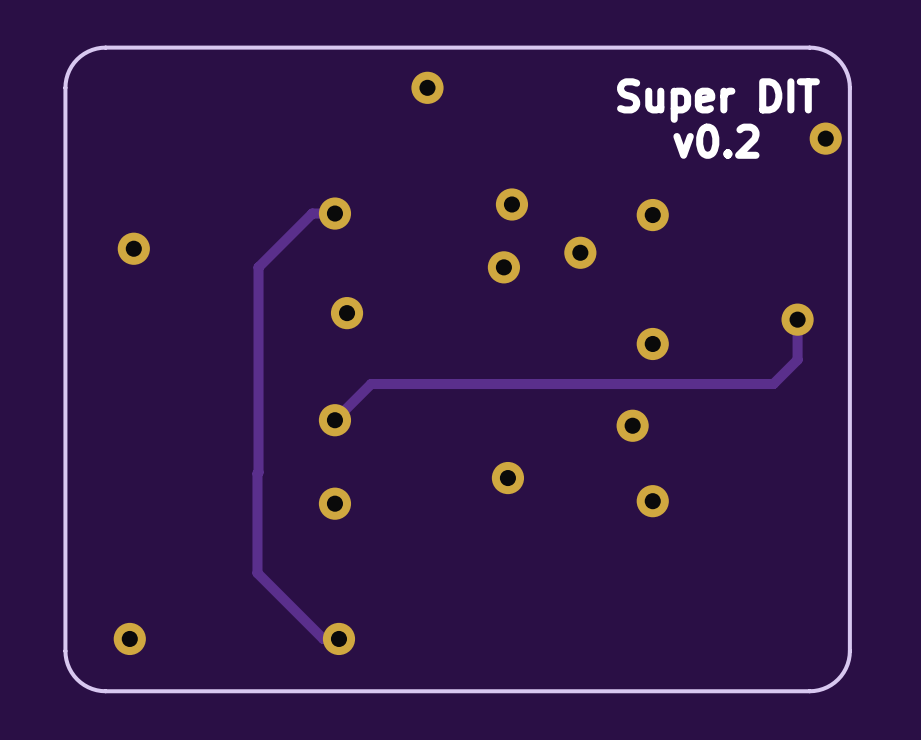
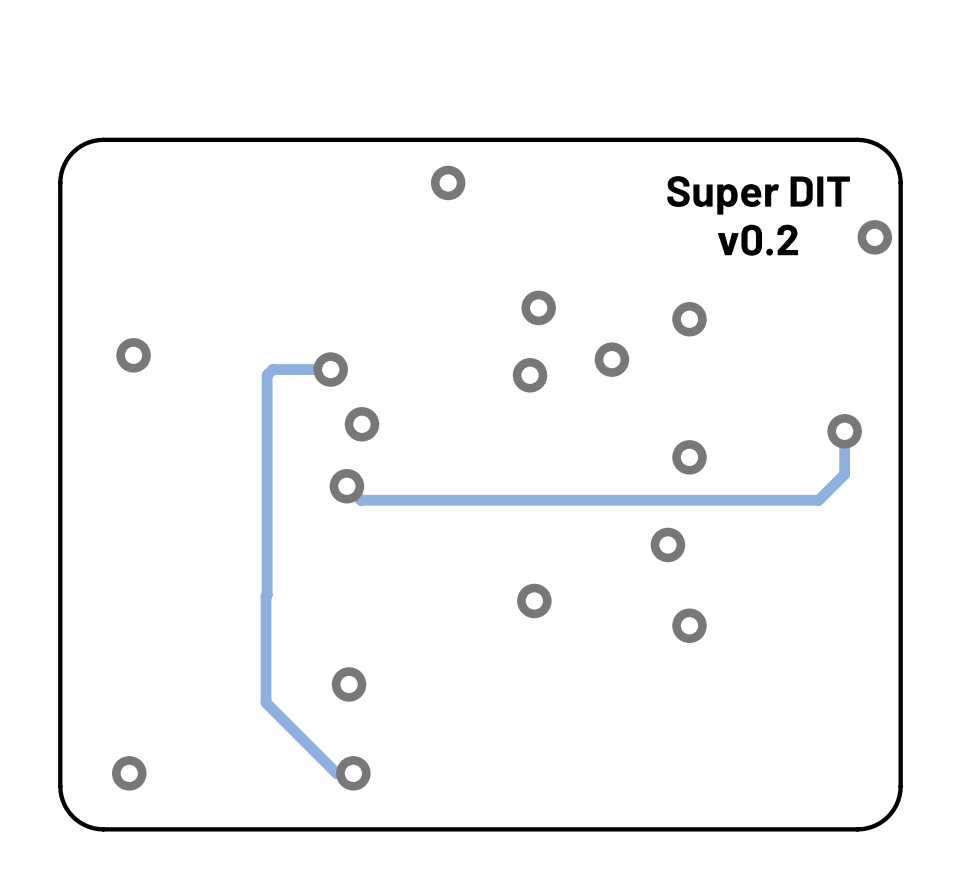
track: (334, 213) (312, 213) (263, 262) -> (330, 369) (272, 369)
via position: (334, 213) -> (330, 369)
track: (371, 384) (334, 420) -> (387, 500) (360, 500) (346, 486)
via position: (334, 420) -> (346, 486)
via position: (334, 503) -> (349, 684)

